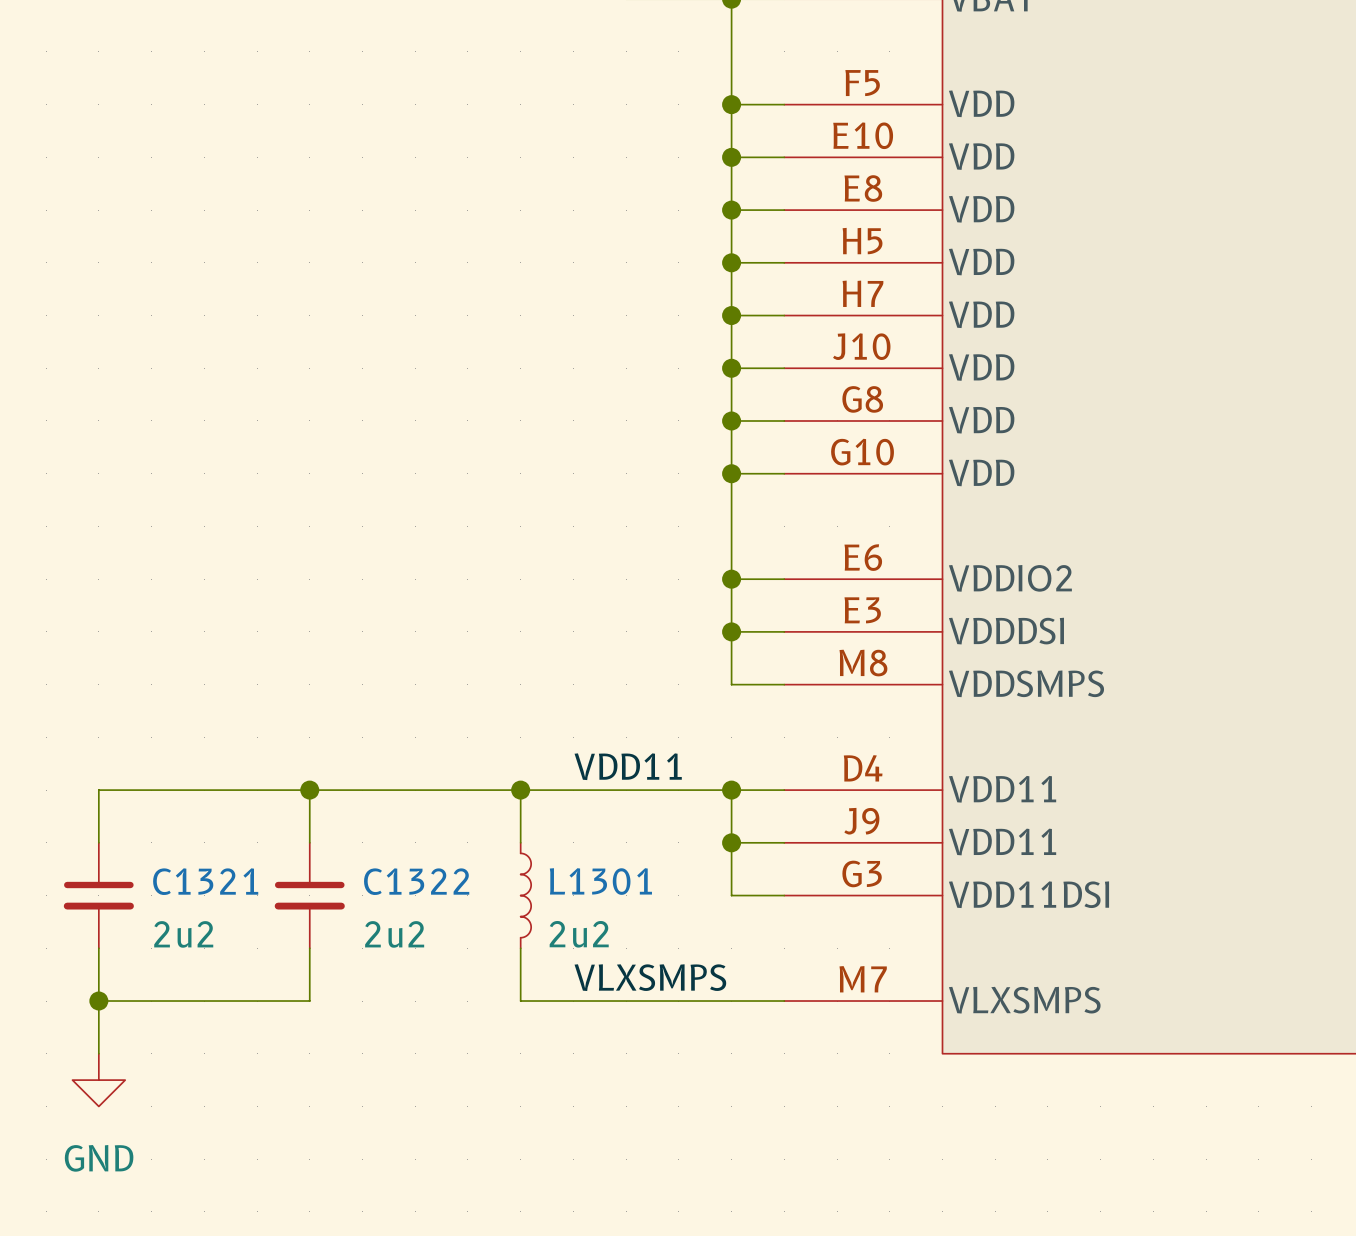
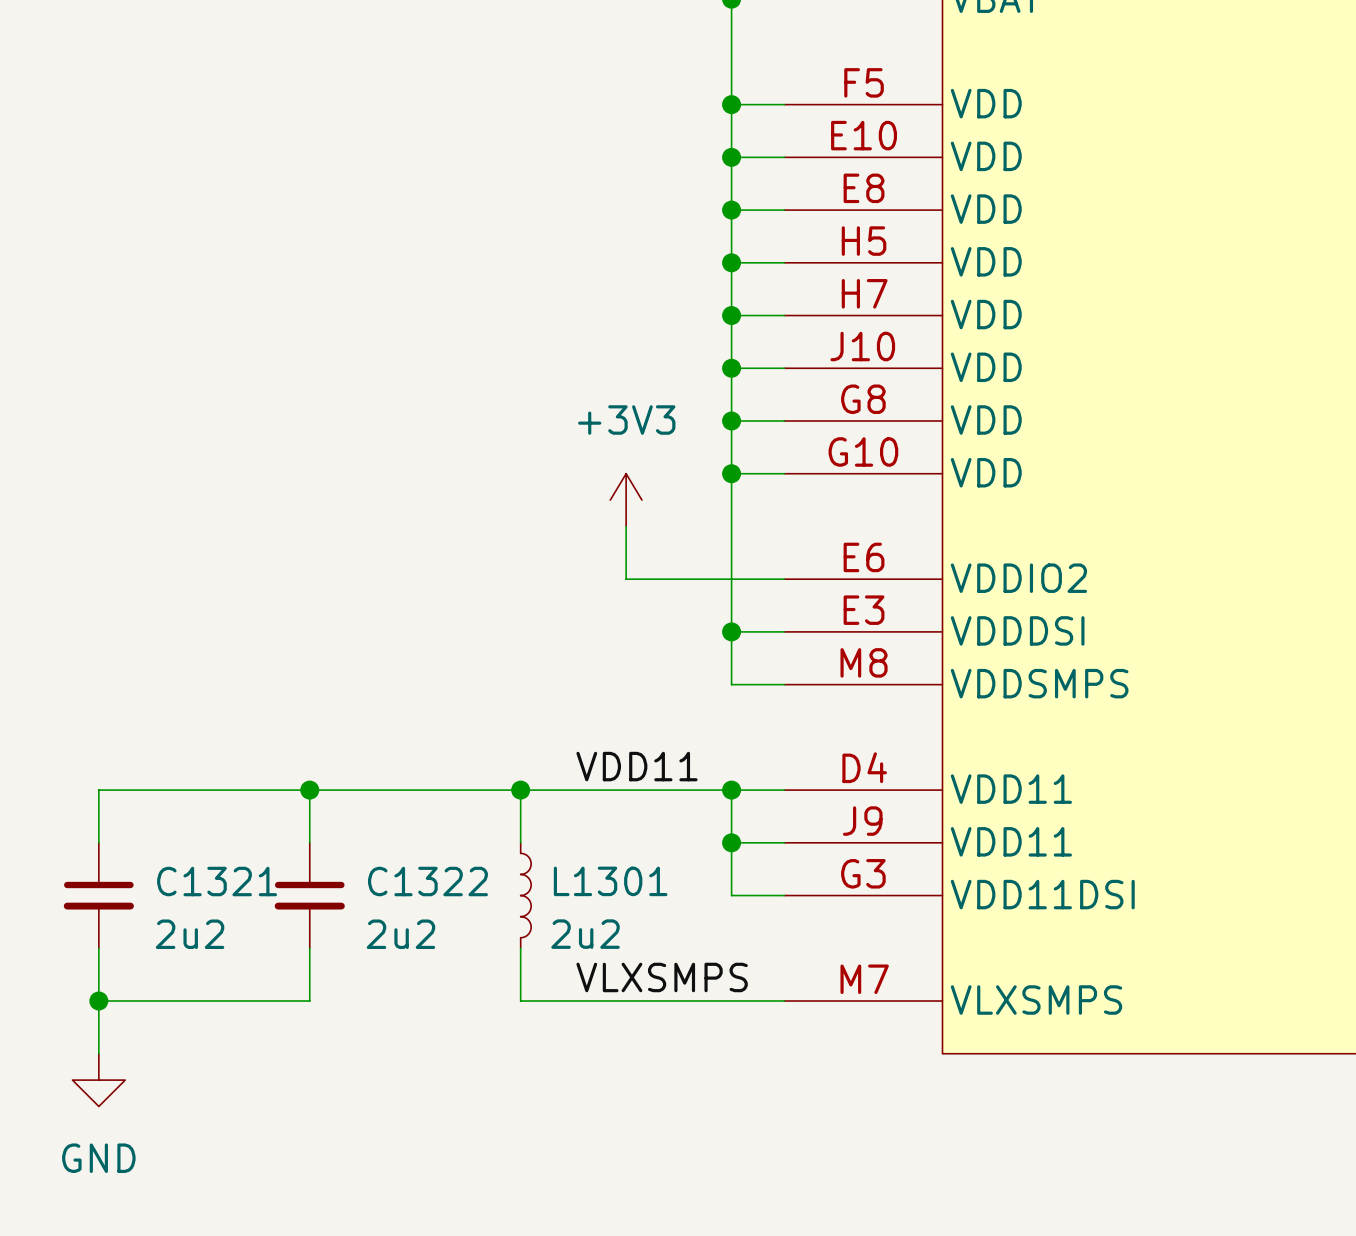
power symbol: none -> +3V3 (626, 500)
wire: none -> (626, 526) (626, 579) (731, 579)
junction: (731, 579) -> none

